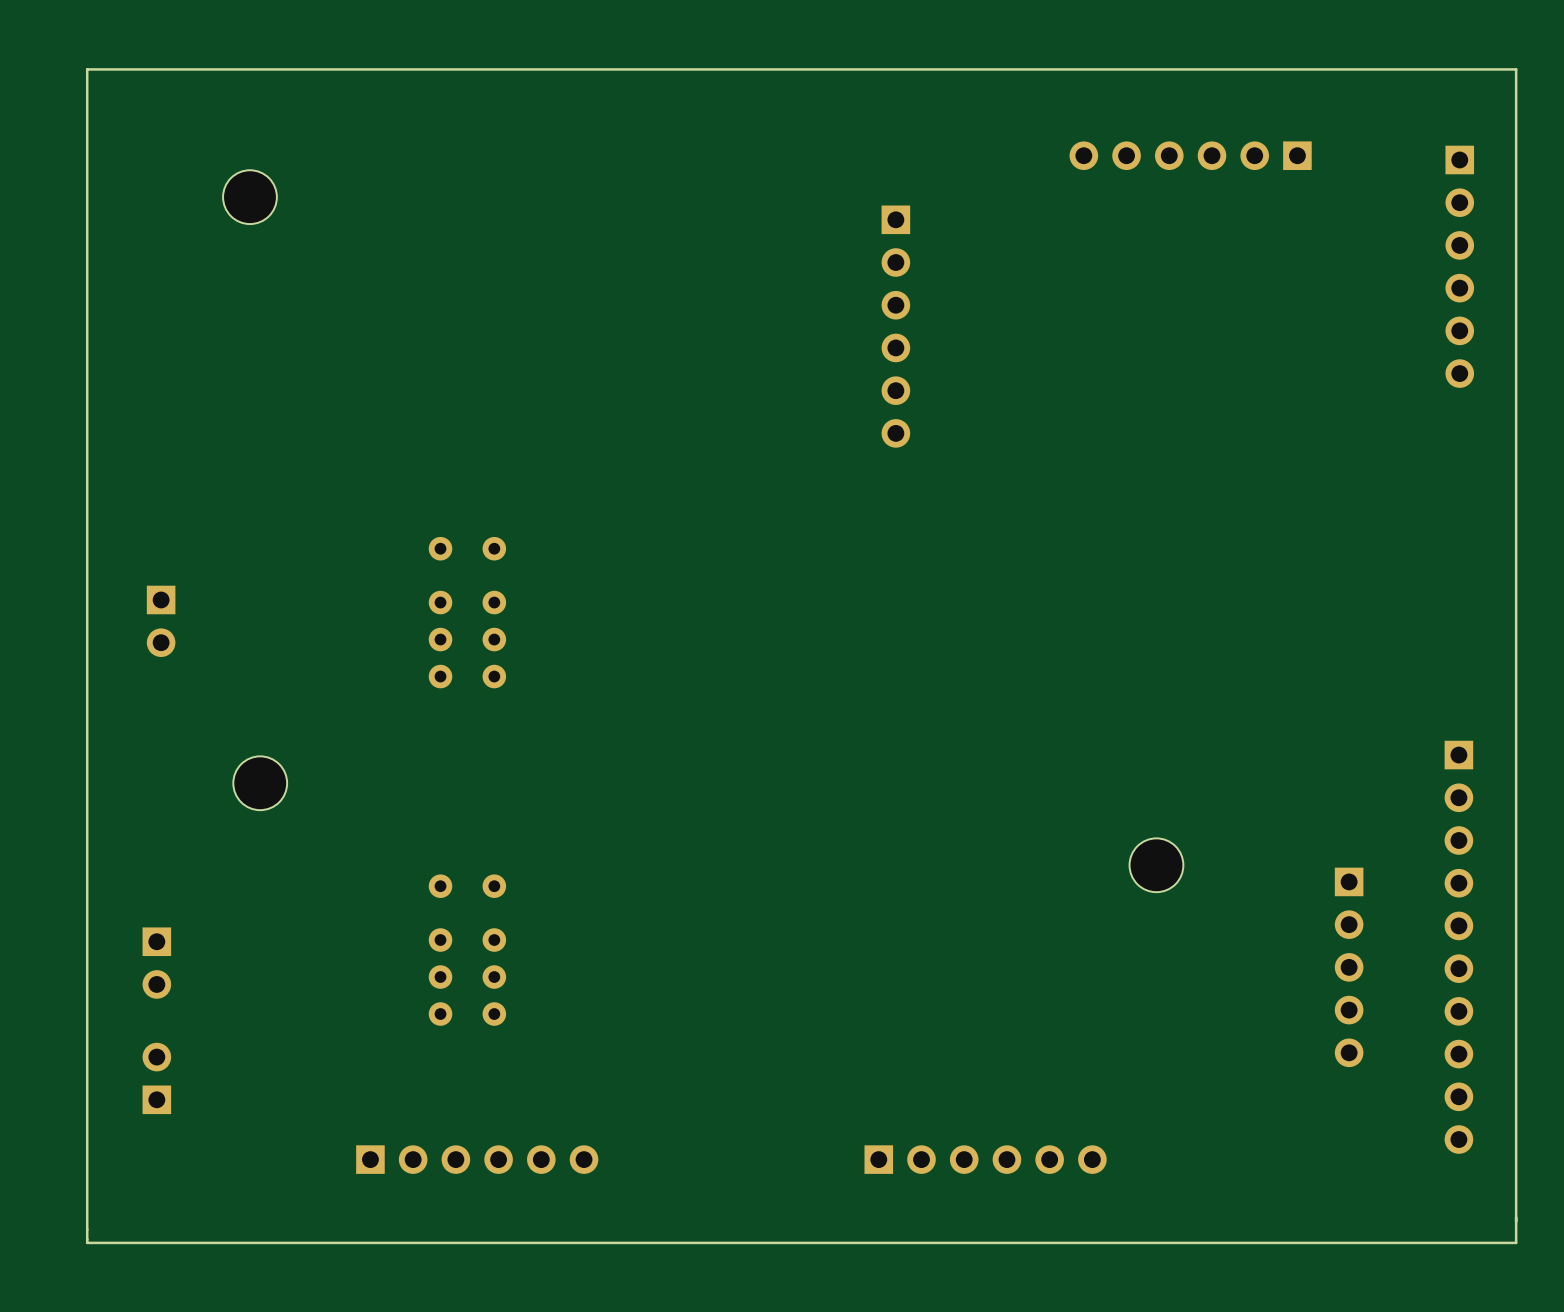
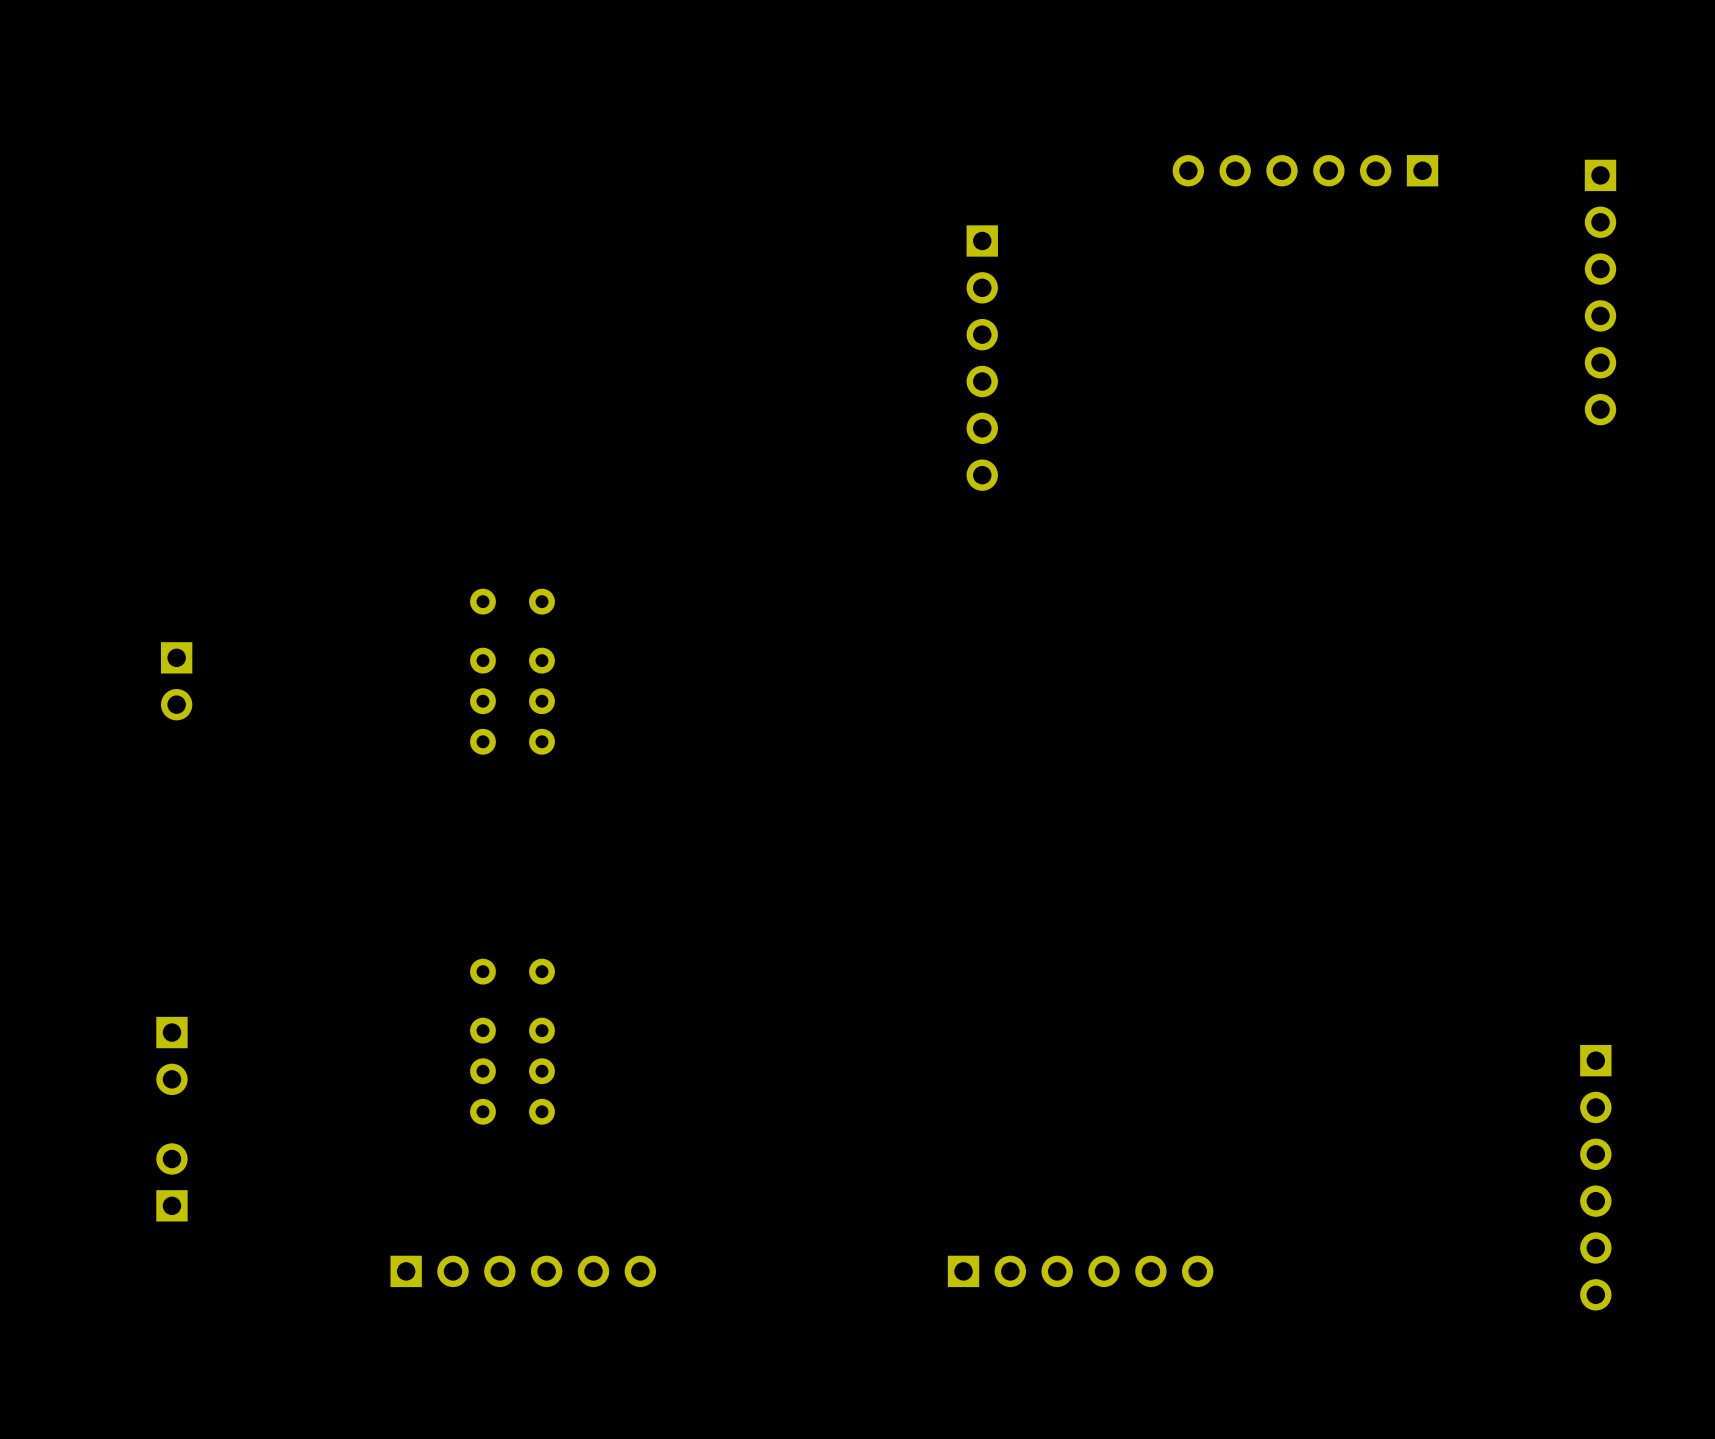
board edge: (1516, 69) (1516, 1242) (87, 1242) (87, 69) (1516, 69) -> none
part: (249, 197) -> none
part: (260, 783) -> none
part: (1156, 865) -> none
part: (1458, 947) -> none
part: (1349, 967) -> none
part: none -> (1595, 1177)

